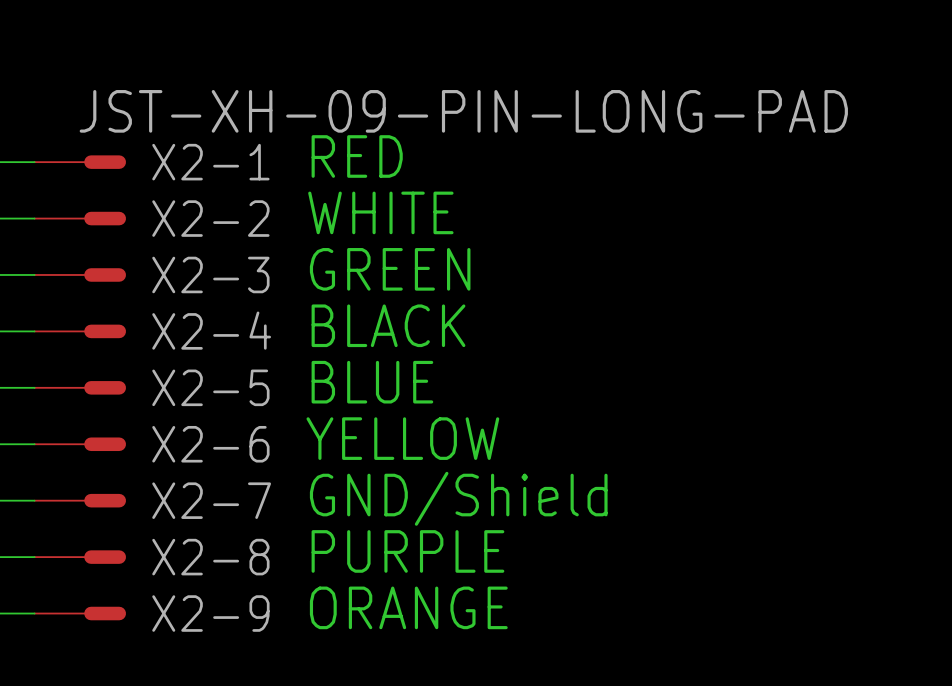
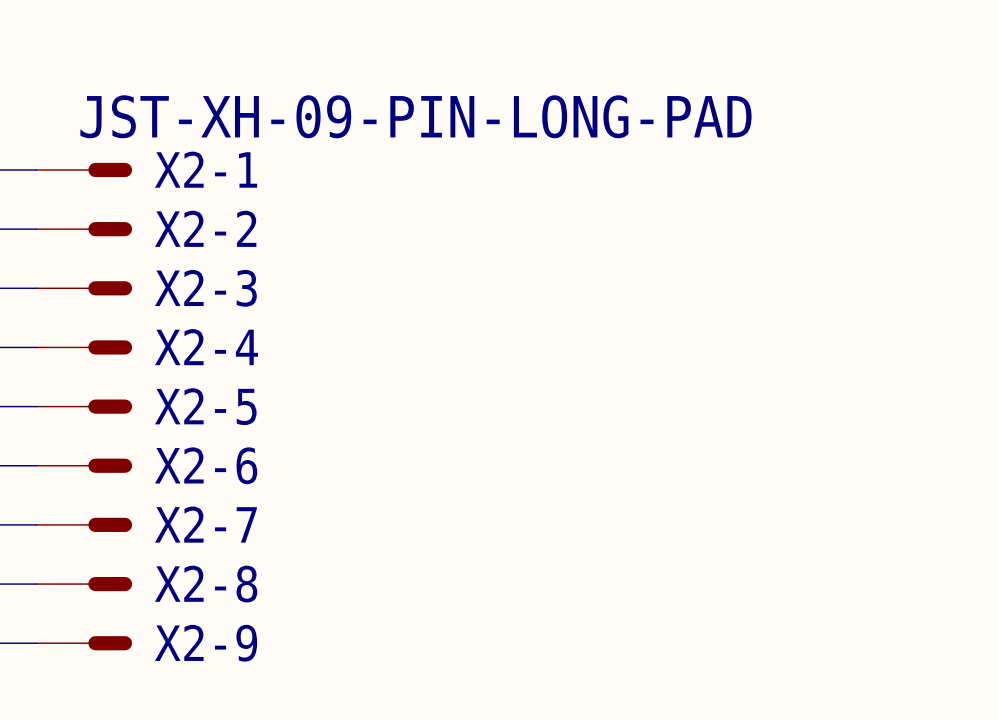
text: RED (357, 156) -> none
text: WHITE (380, 212) -> none
text: GREEN (390, 269) -> none
text: BLACK (388, 325) -> none
text: BLUE (372, 382) -> none
text: YELLOW (402, 438) -> none
text: GND/Shield (458, 498) -> none
text: PURPLE (407, 551) -> none
text: ORANGE (408, 607) -> none

